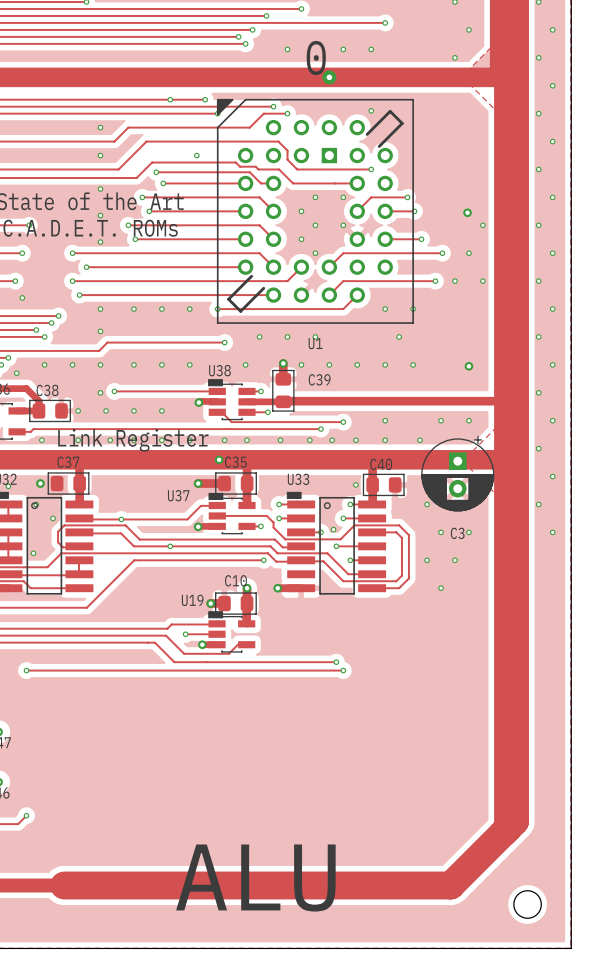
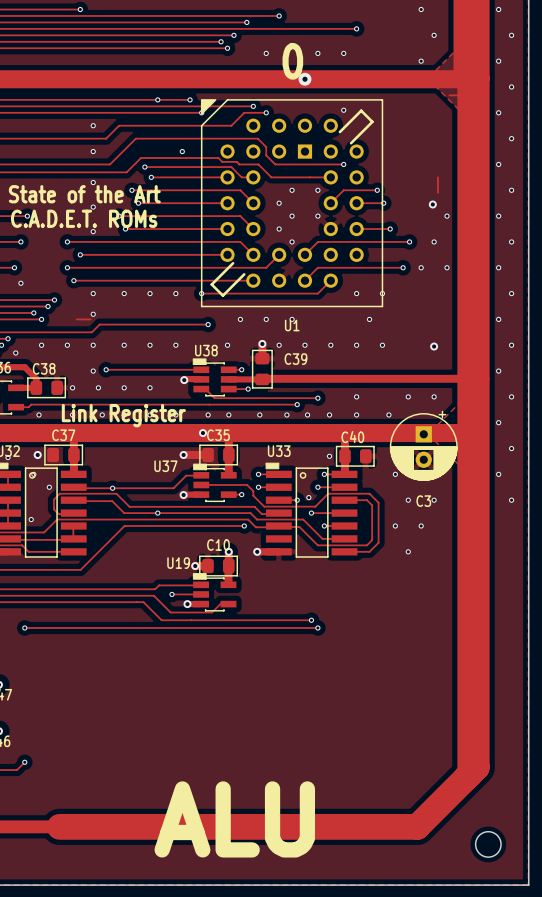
track: none -> (449, 95) (467, 95)
track: none -> (437, 177) (437, 192)
track: none -> (76, 319) (90, 319)

